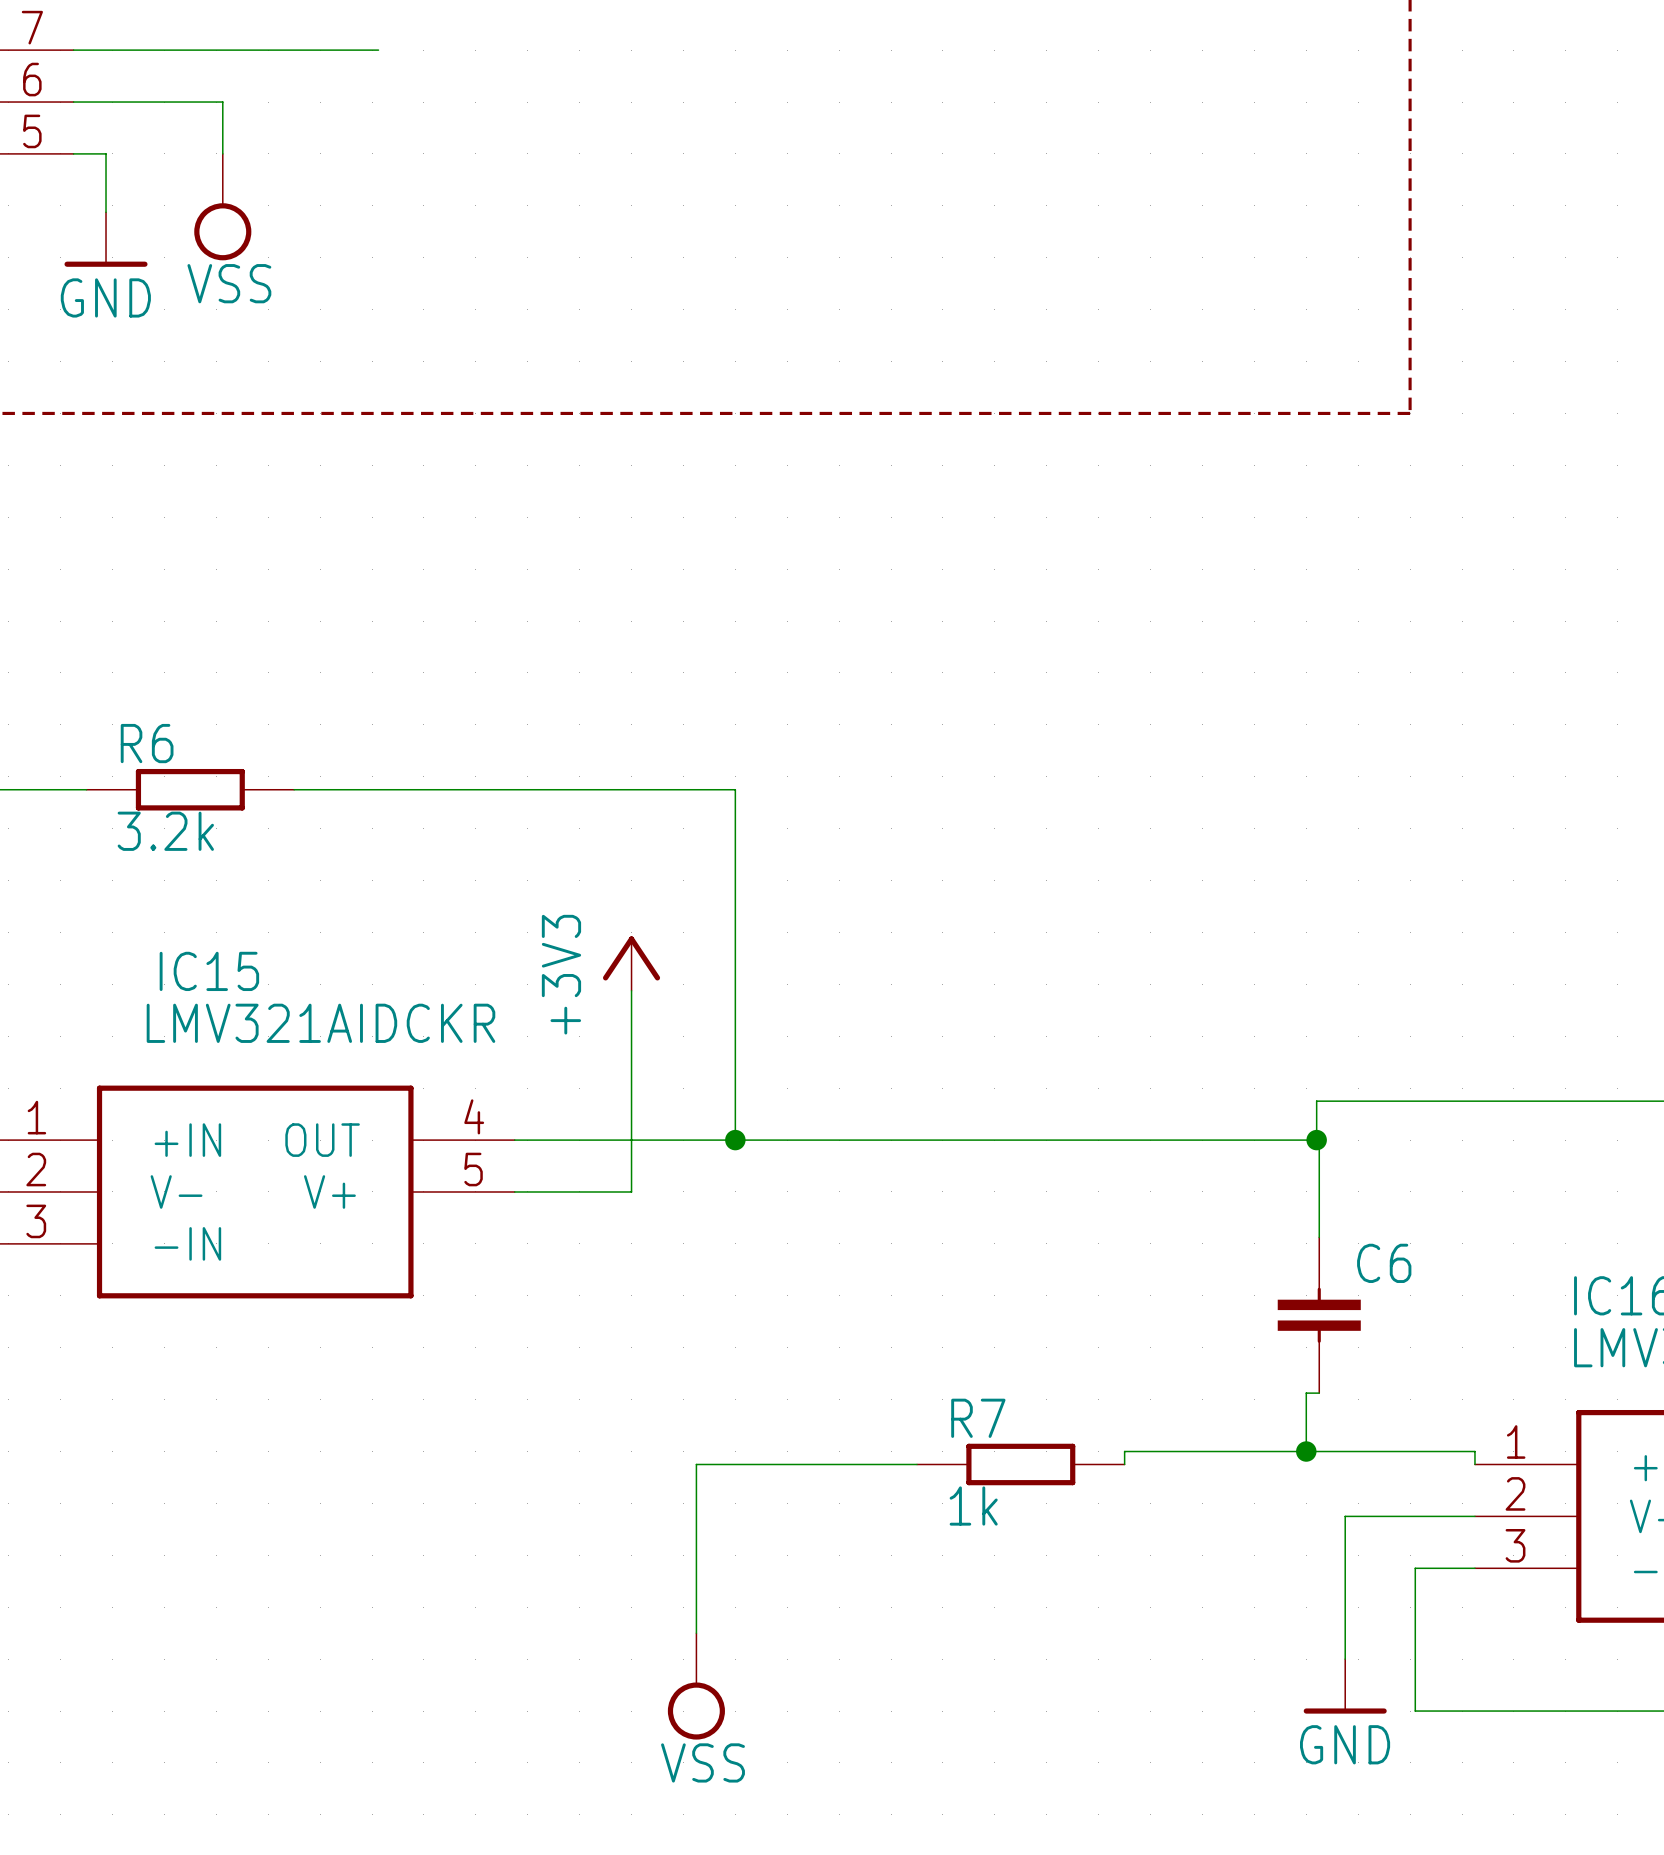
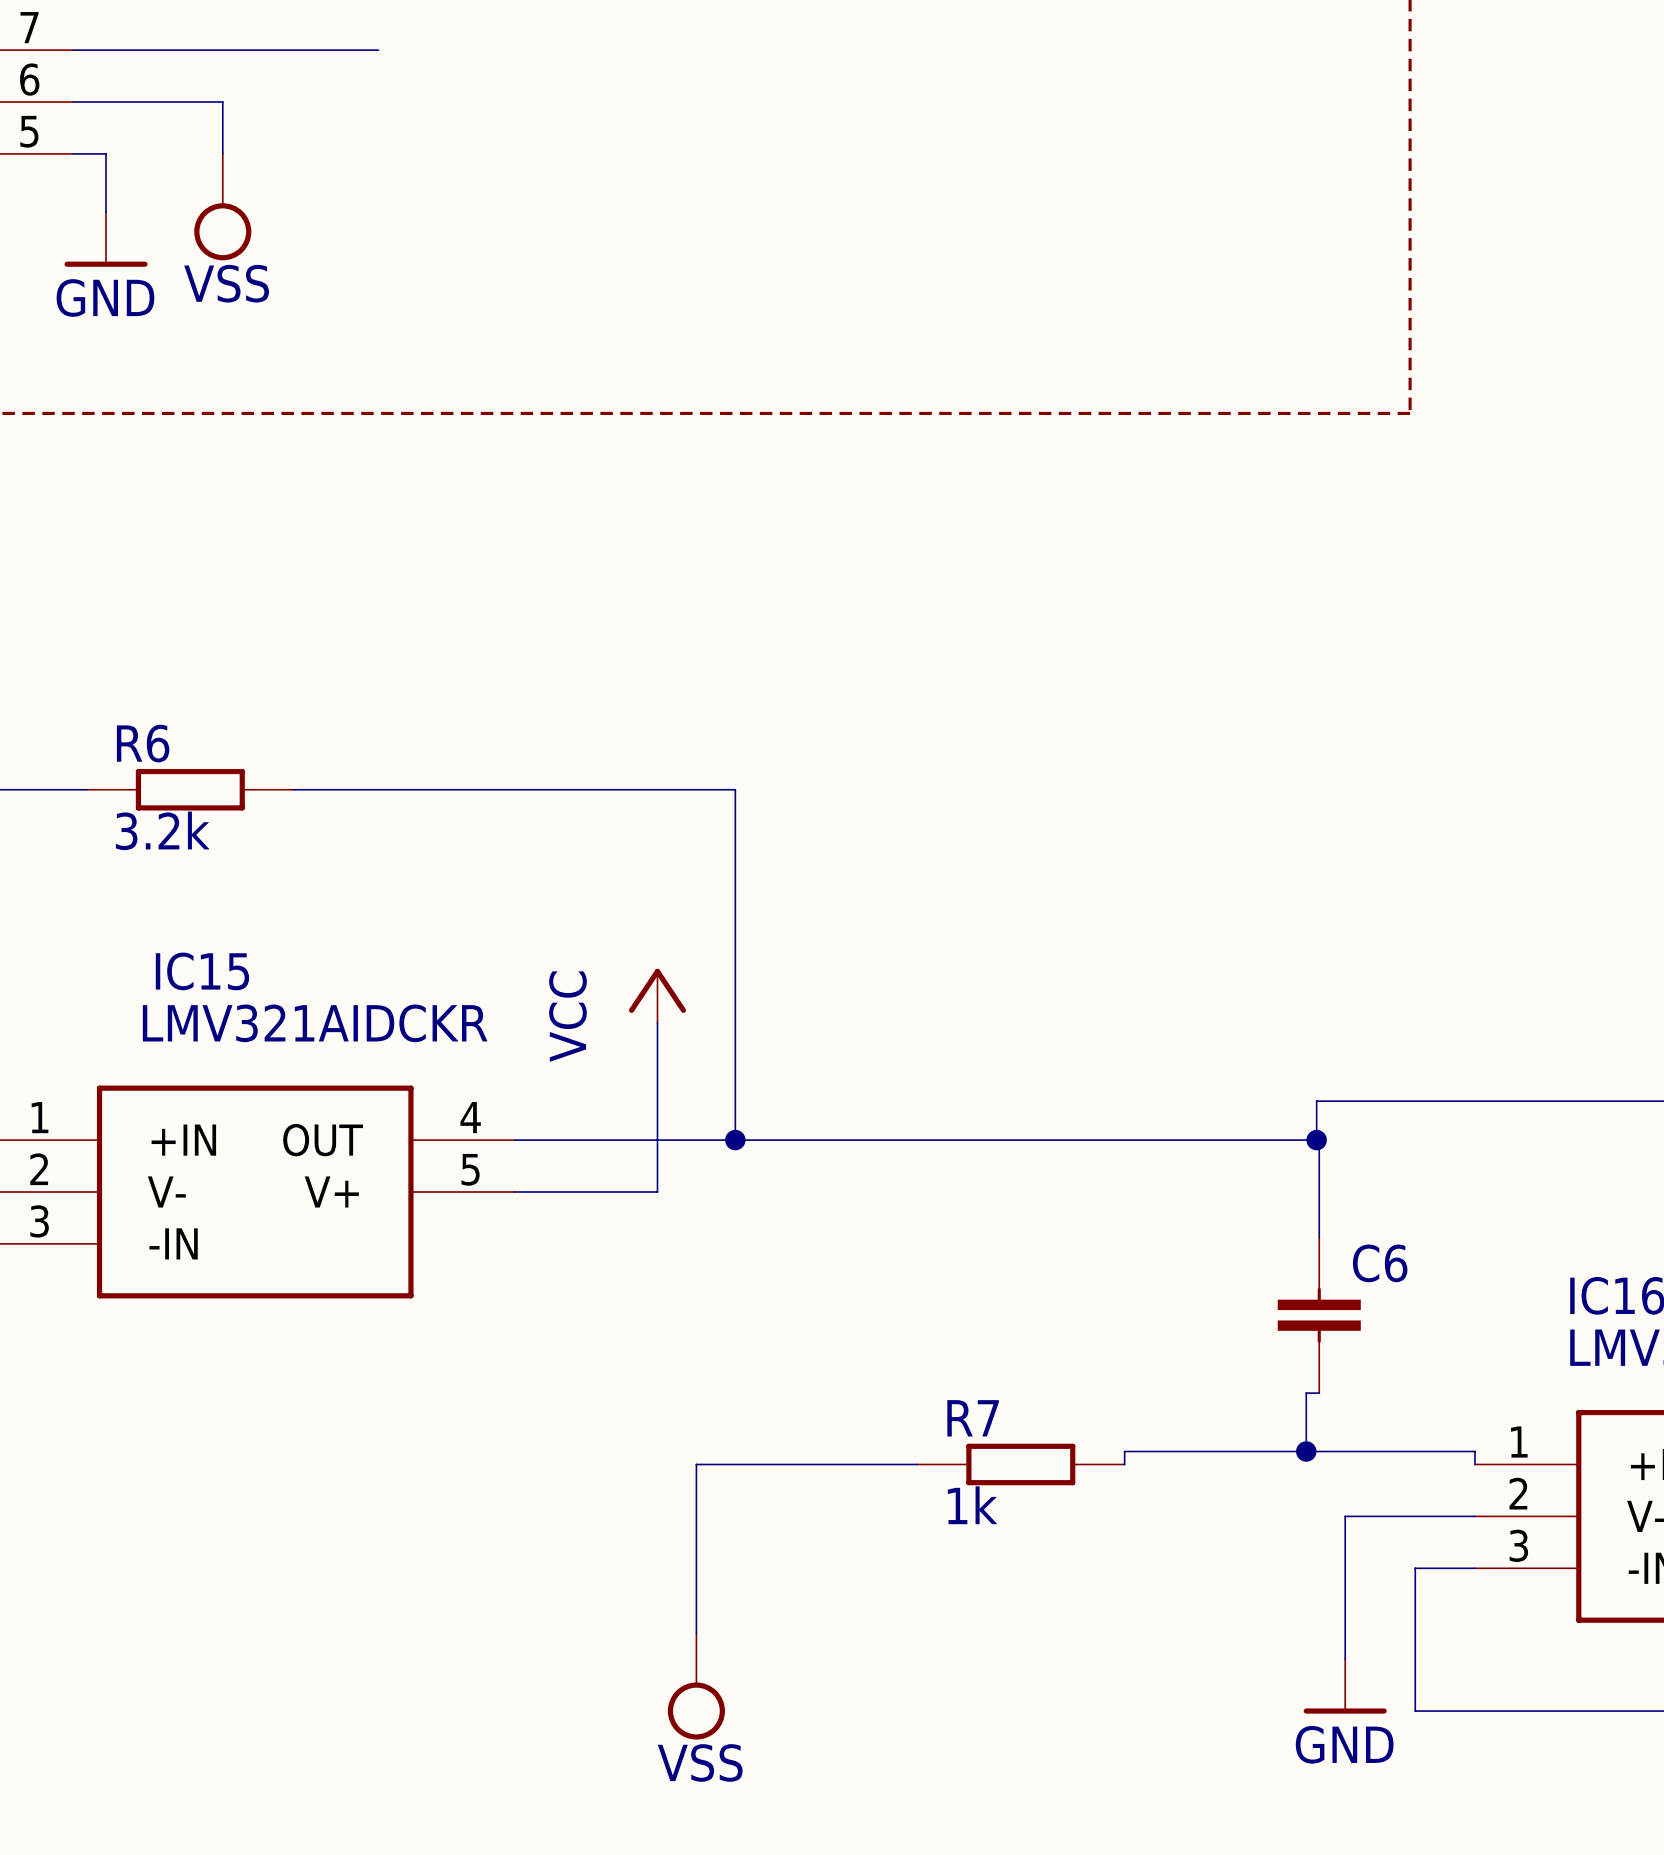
power symbol: +3V3 (631, 963) -> none
wire: (631, 990) (631, 1191) -> (657, 1023) (657, 1191) (631, 1191)
power symbol: none -> VCC (657, 996)

